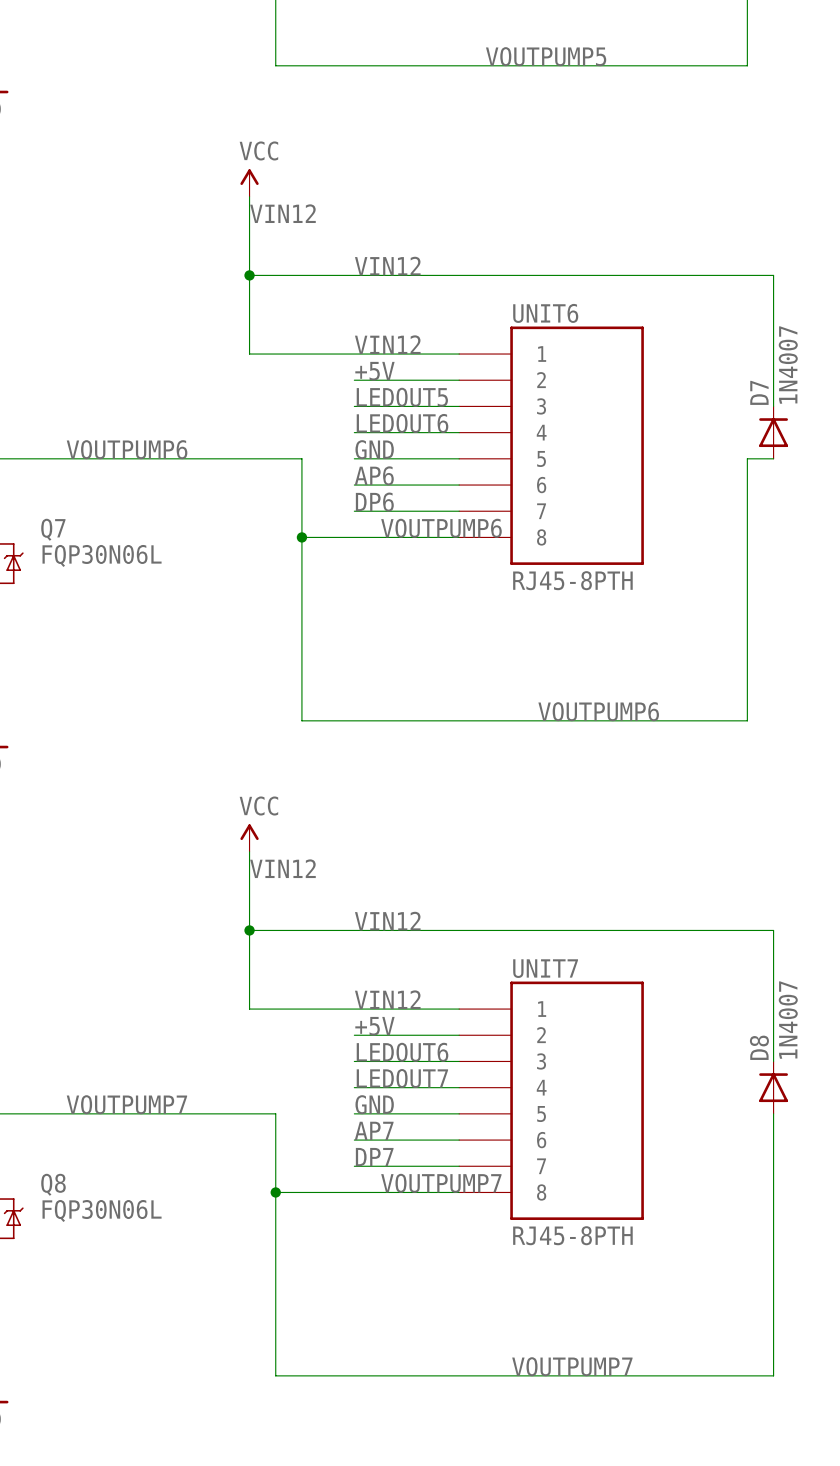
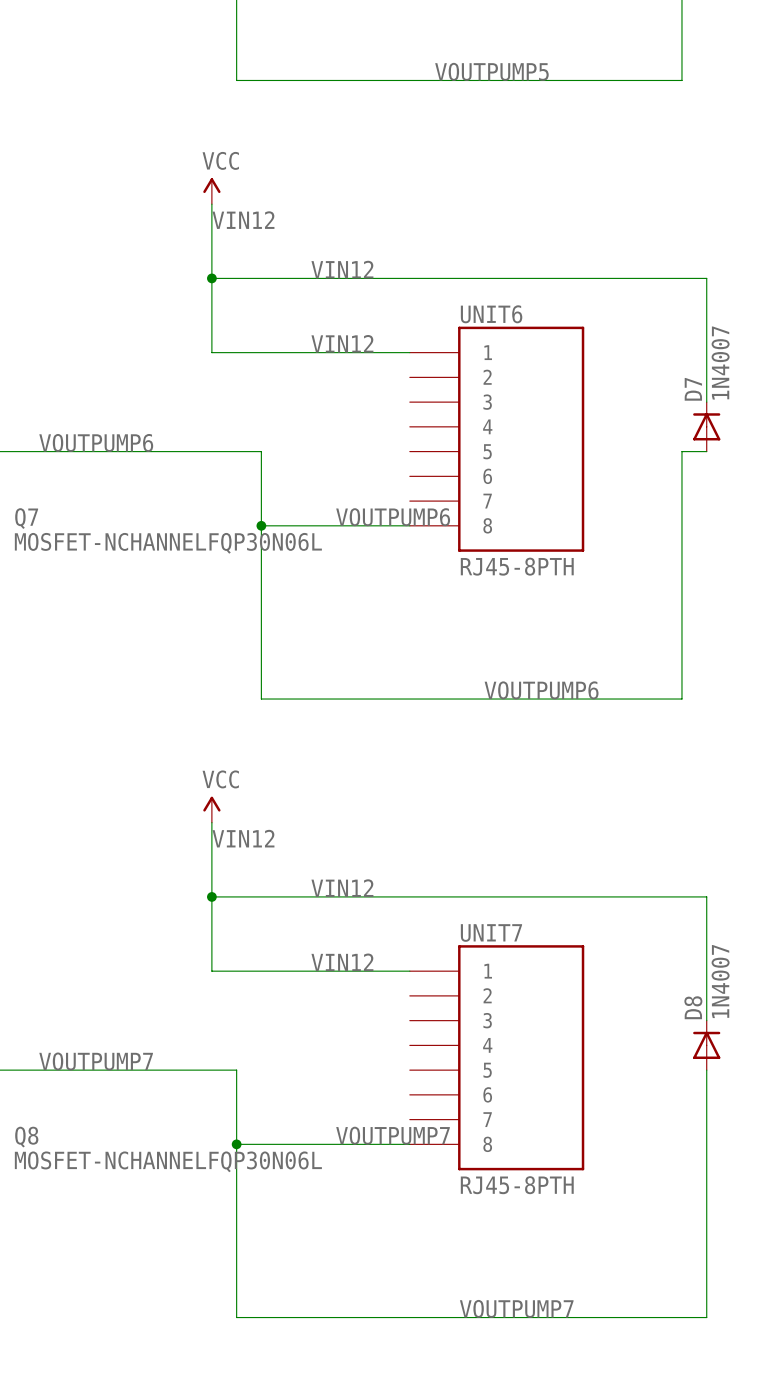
label: +5V (374, 371) -> none
wire: (354, 380) (459, 380) -> none
label: LEDOUT5 (402, 397) -> none
wire: (354, 406) (459, 406) -> none
label: LEDOUT6 (402, 423) -> none
wire: (354, 432) (459, 432) -> none
label: GND (374, 449) -> none
wire: (354, 458) (459, 458) -> none
label: AP6 (374, 475) -> none
wire: (354, 485) (459, 485) -> none
label: DP6 (374, 502) -> none
wire: (354, 511) (459, 511) -> none
Q7 value: FQP30N06L (102, 555) -> MOSFET-NCHANNELFQP30N06L (168, 543)
label: +5V (374, 1026) -> none
wire: (354, 1035) (459, 1035) -> none
label: LEDOUT6 (402, 1052) -> none
wire: (354, 1061) (459, 1061) -> none
label: LEDOUT7 (402, 1078) -> none
wire: (354, 1087) (459, 1087) -> none
label: GND (374, 1104) -> none
wire: (354, 1113) (459, 1113) -> none
label: AP7 (374, 1130) -> none
wire: (354, 1140) (459, 1140) -> none
label: DP7 (374, 1157) -> none
wire: (354, 1166) (459, 1166) -> none
Q8 value: FQP30N06L (102, 1210) -> MOSFET-NCHANNELFQP30N06L (168, 1161)

